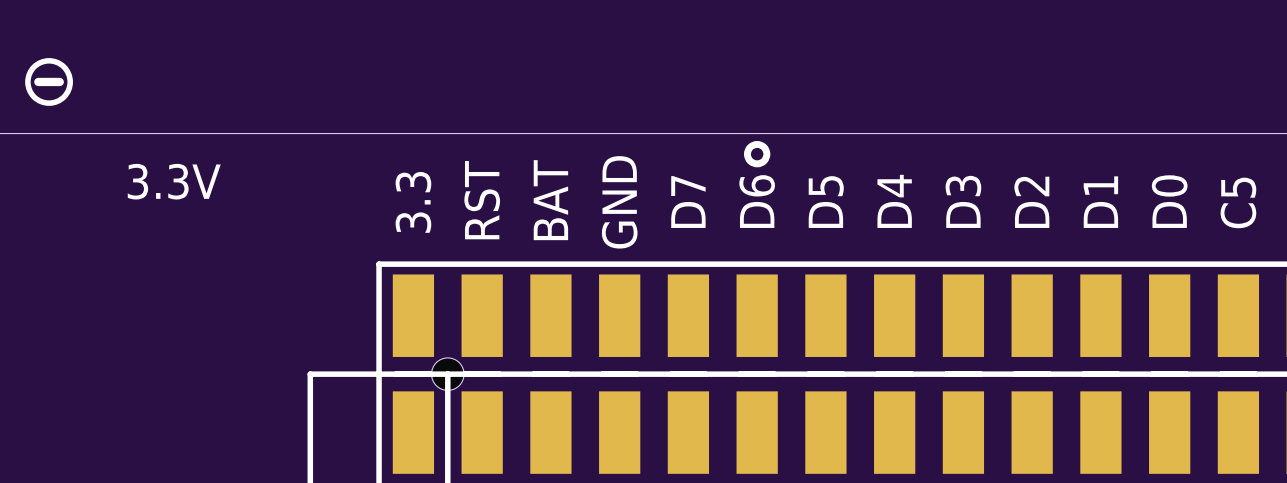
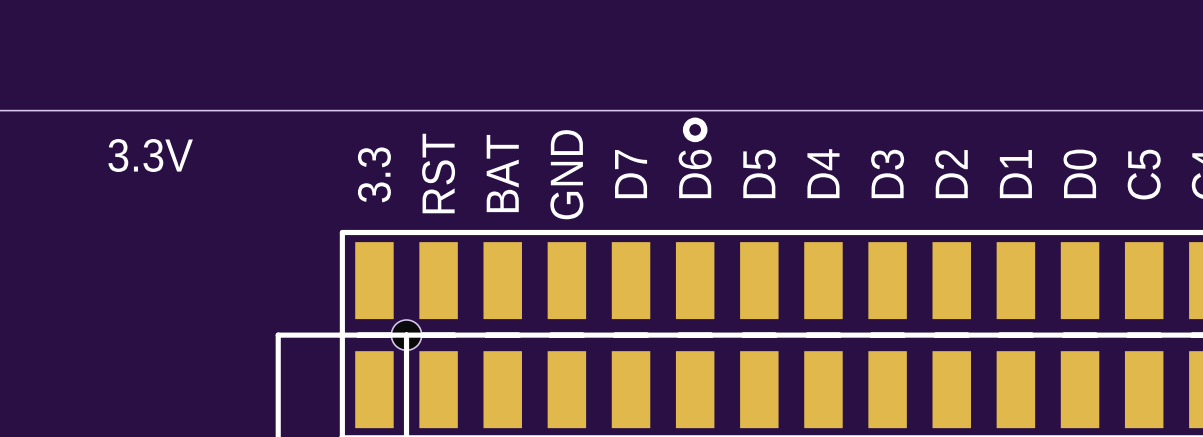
drawing: [25, 58, 73, 106] -> none

